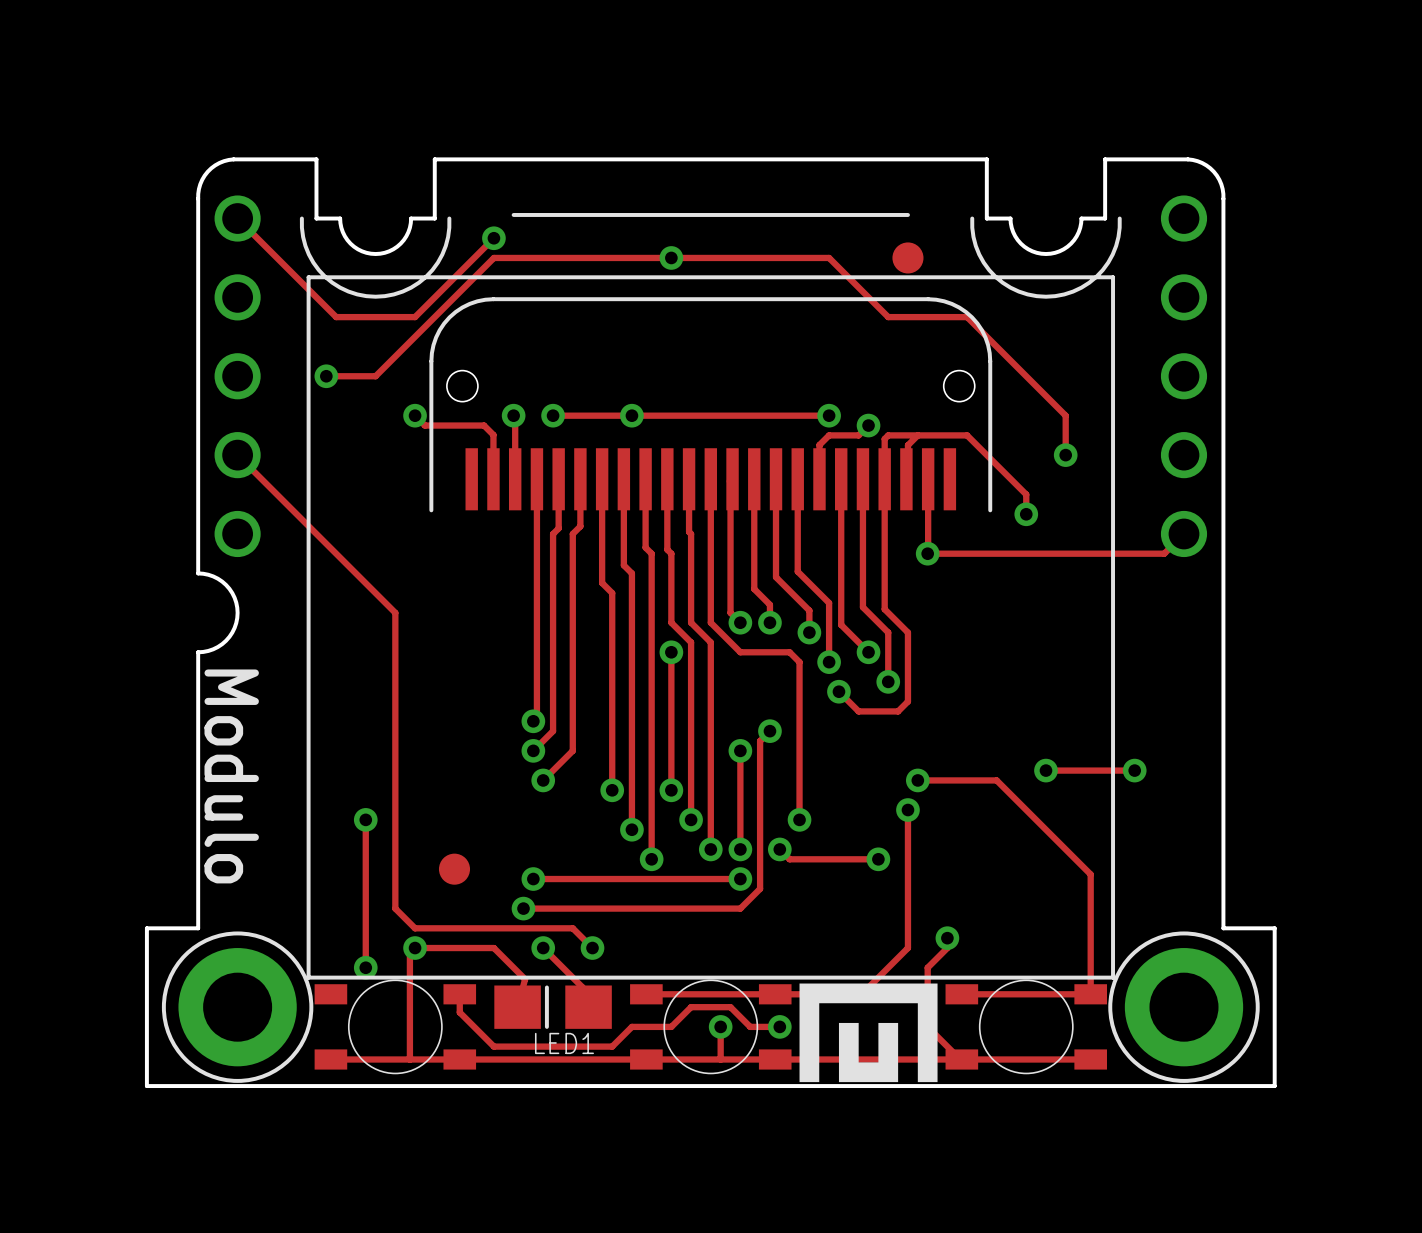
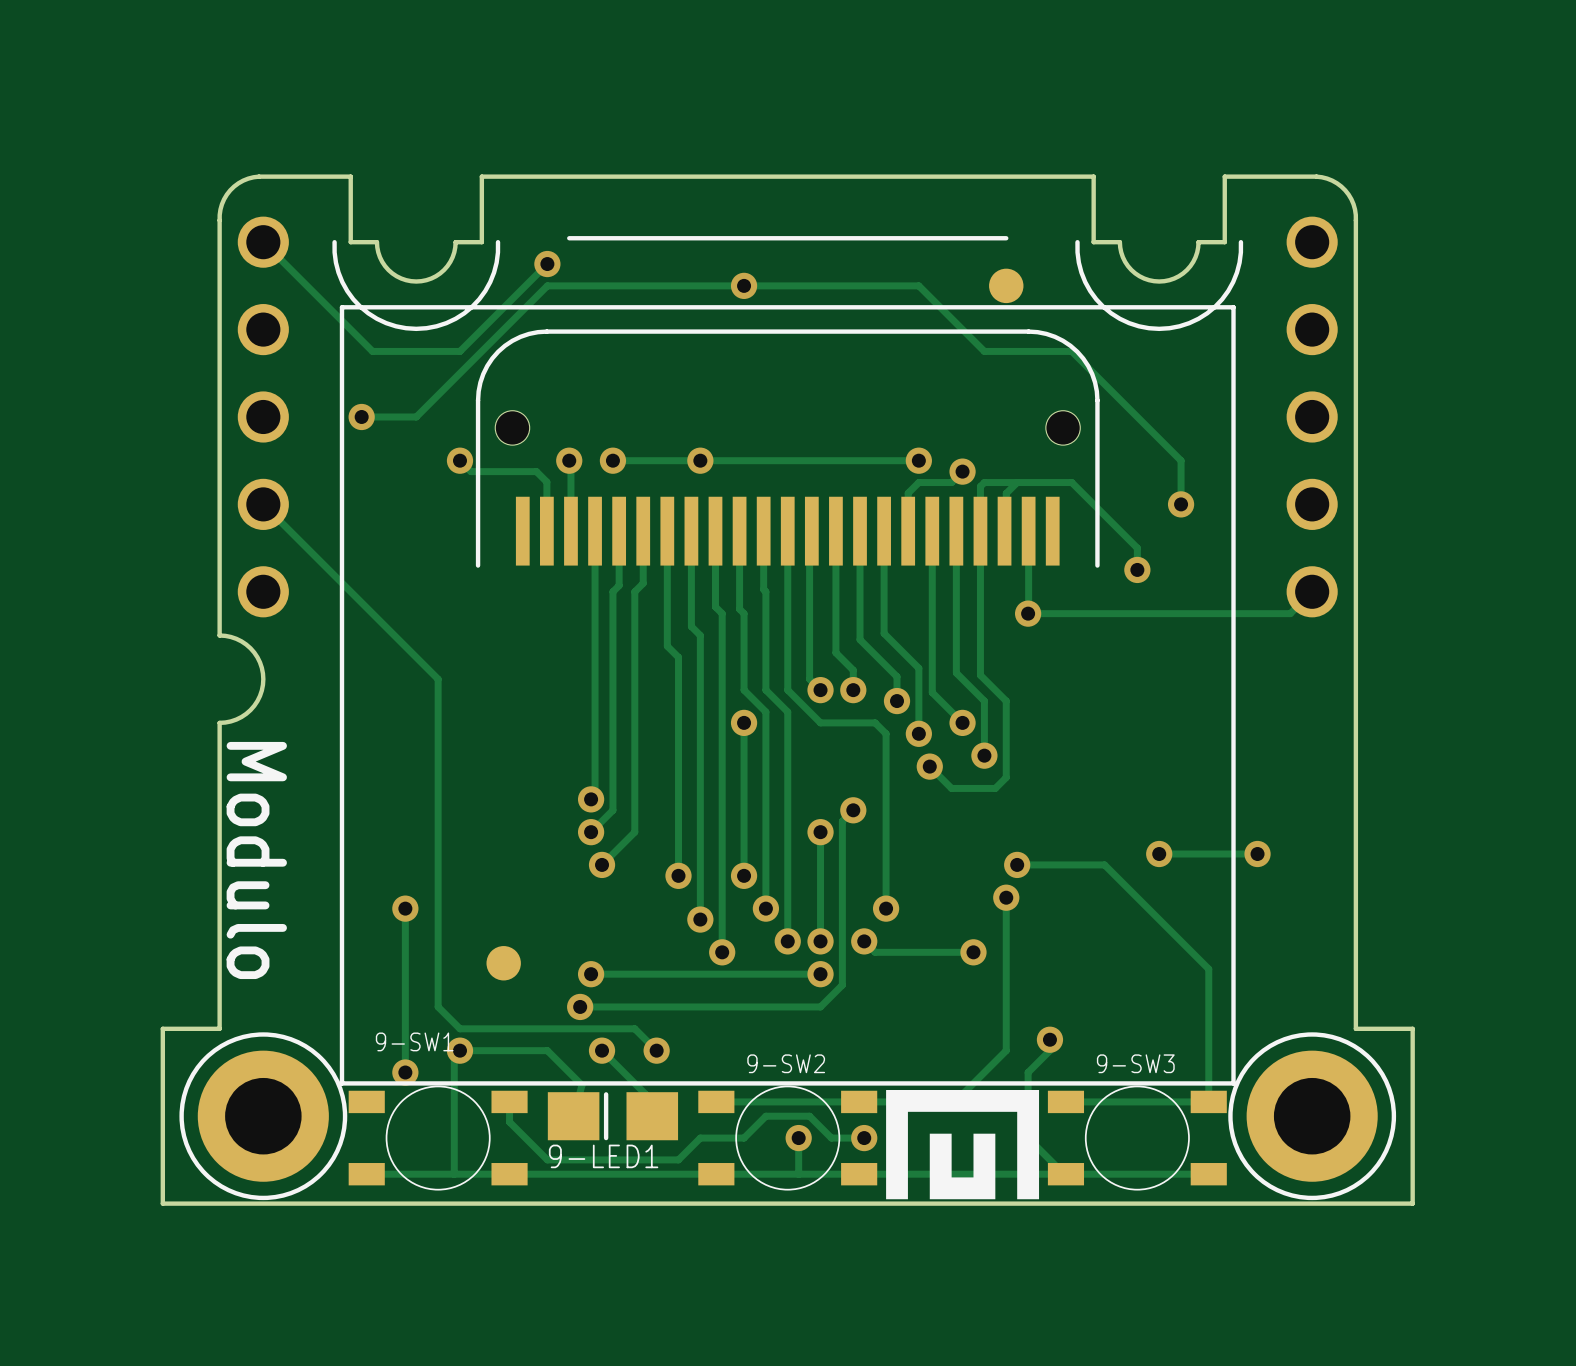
9-SW1 name: none -> 9-SW1 (414, 1041)
9-SW2 name: none -> 9-SW2 (786, 1063)
9-SW3 name: none -> 9-SW3 (1135, 1063)
LED1 name: LED1 (564, 1043) -> 9-LED1 (603, 1156)

